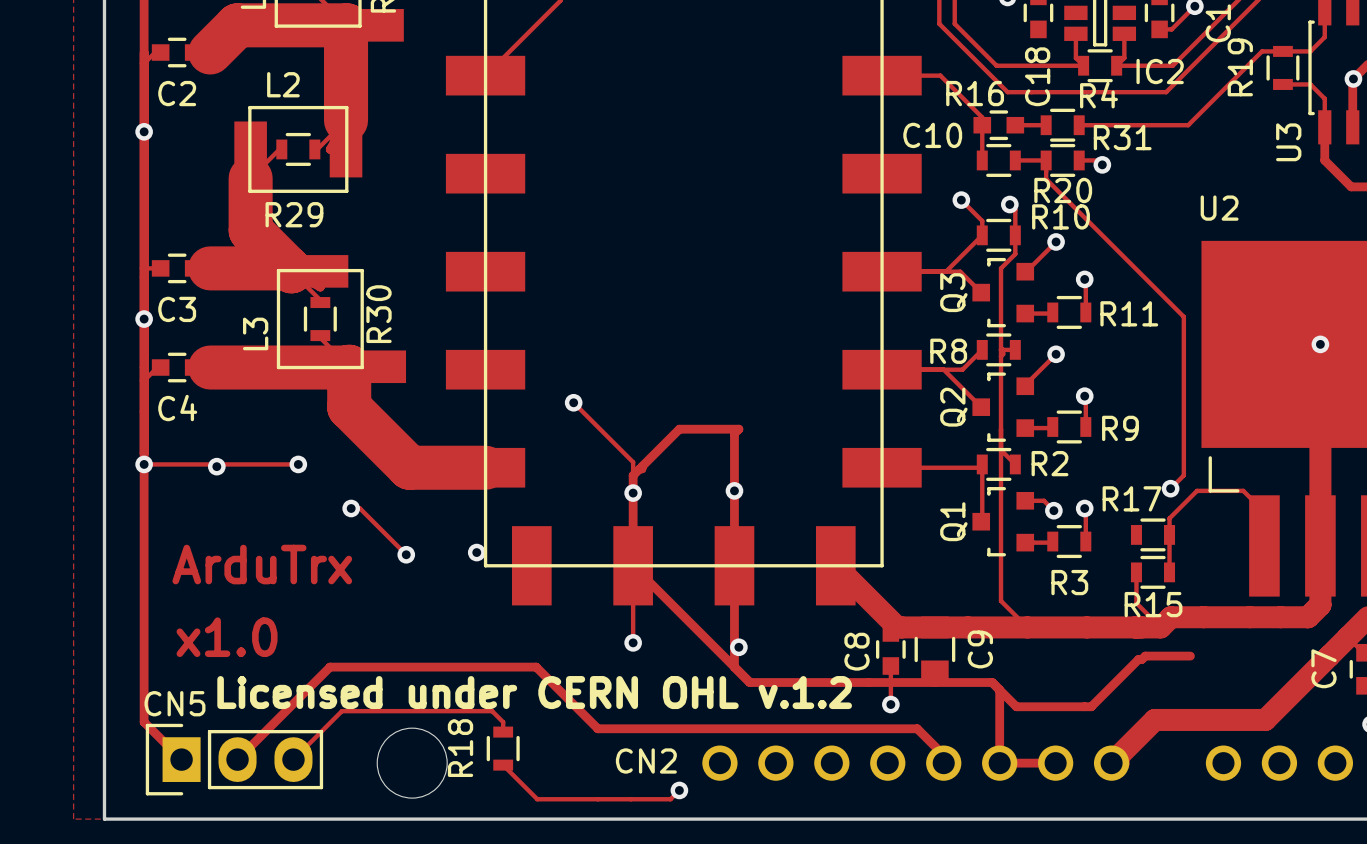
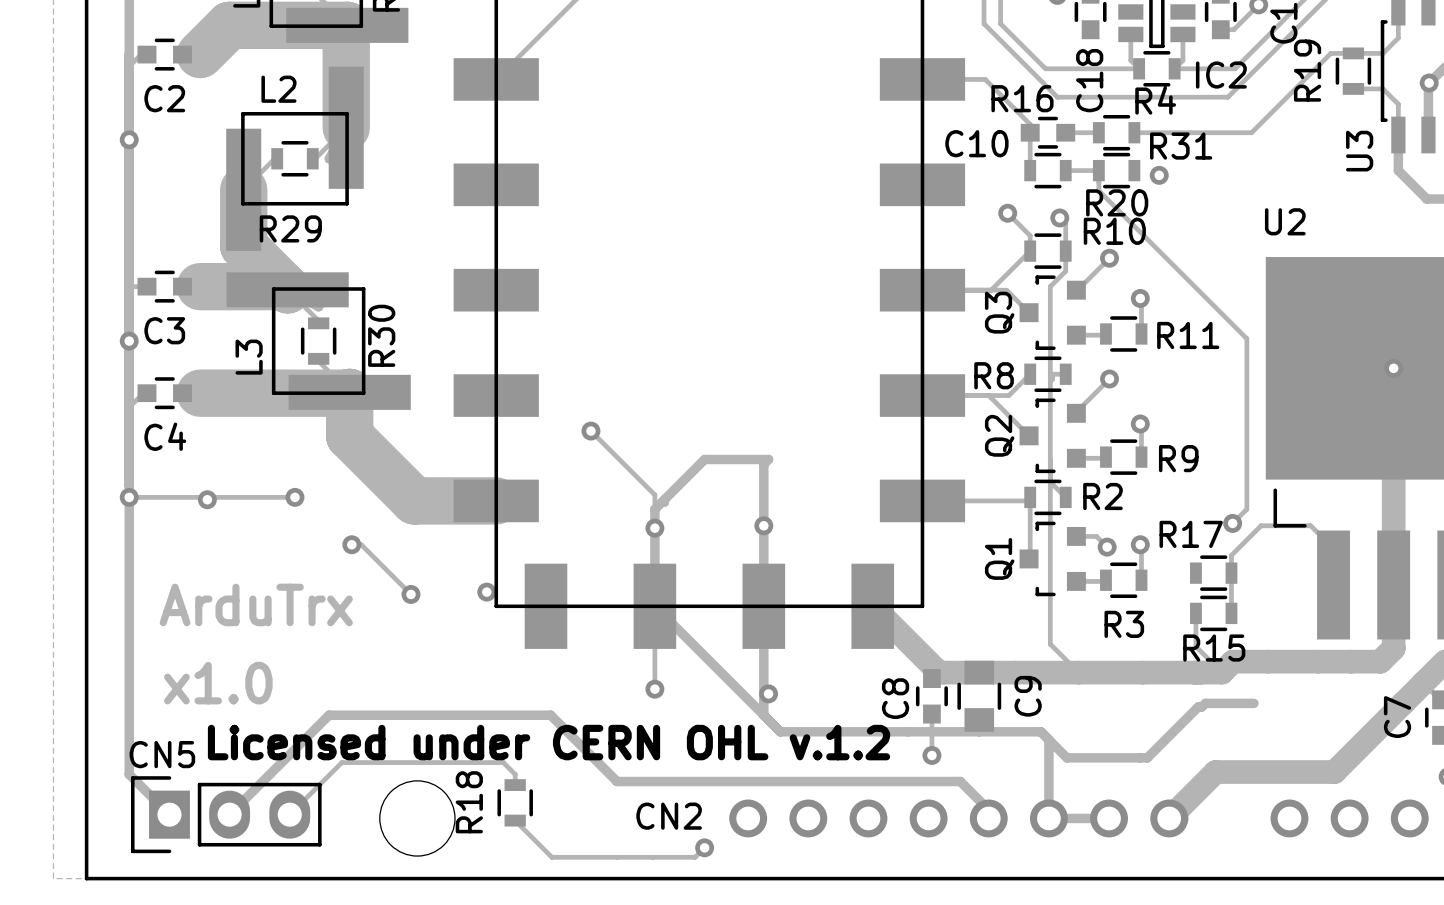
track: (1079, 160) (1097, 160) (1102, 164) -> none

